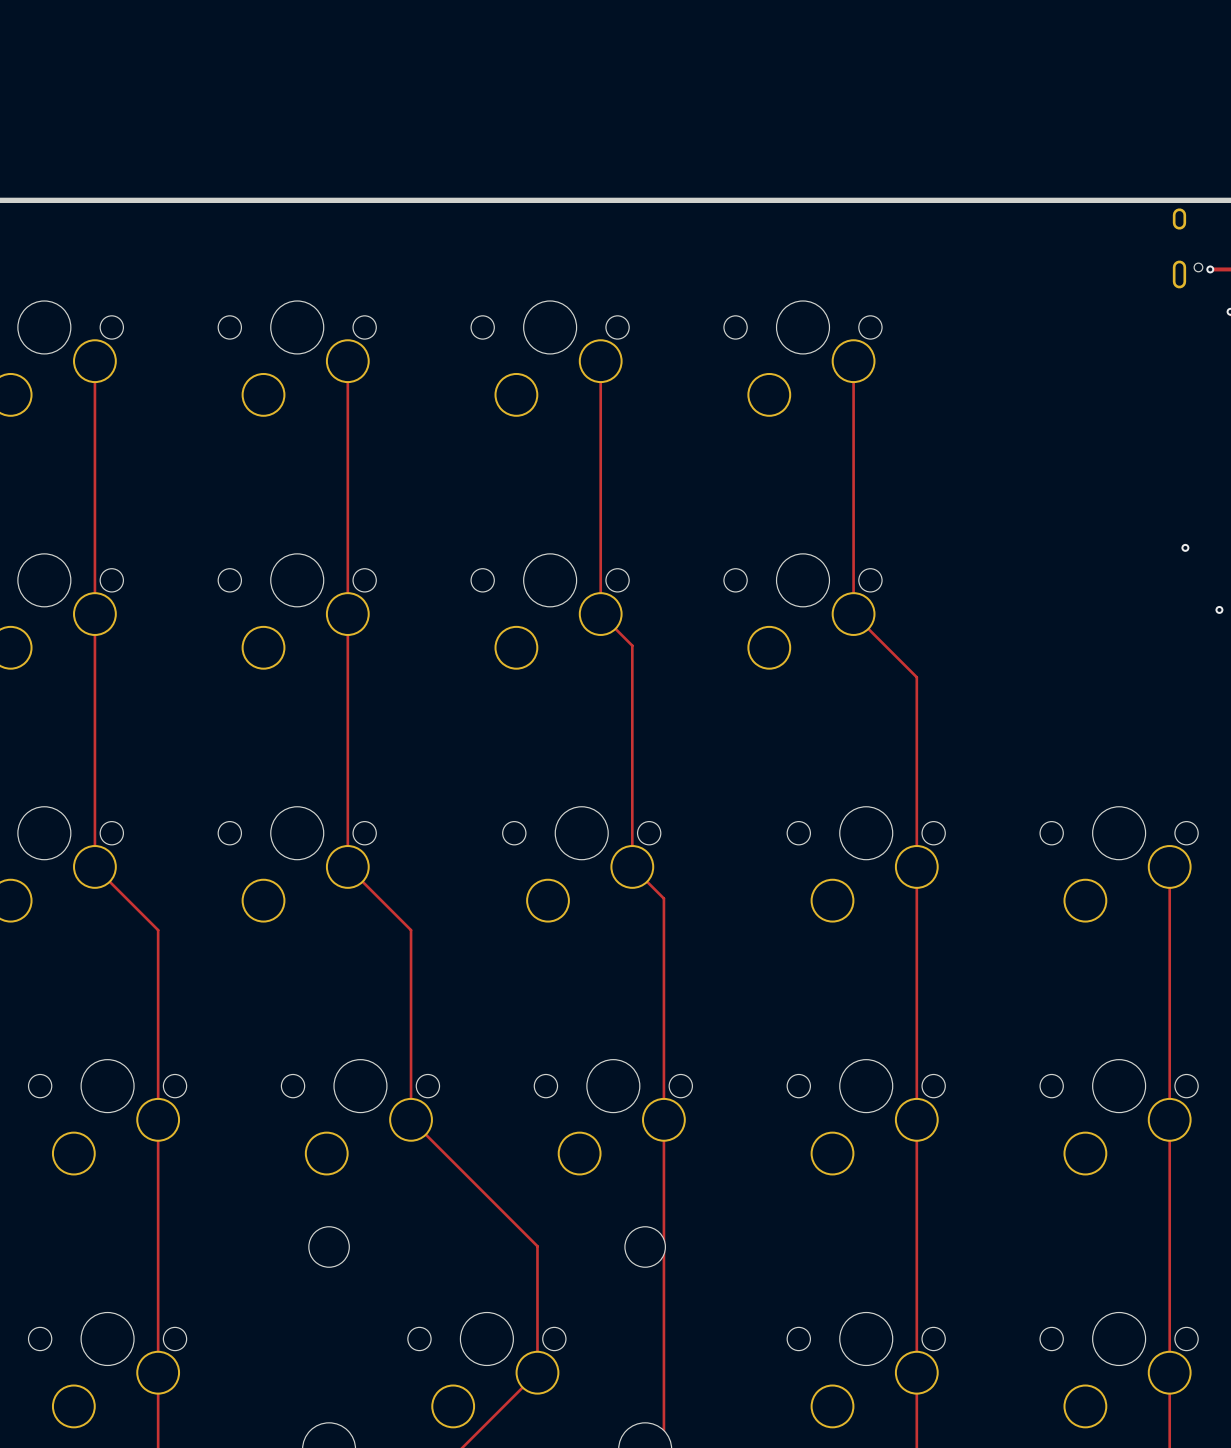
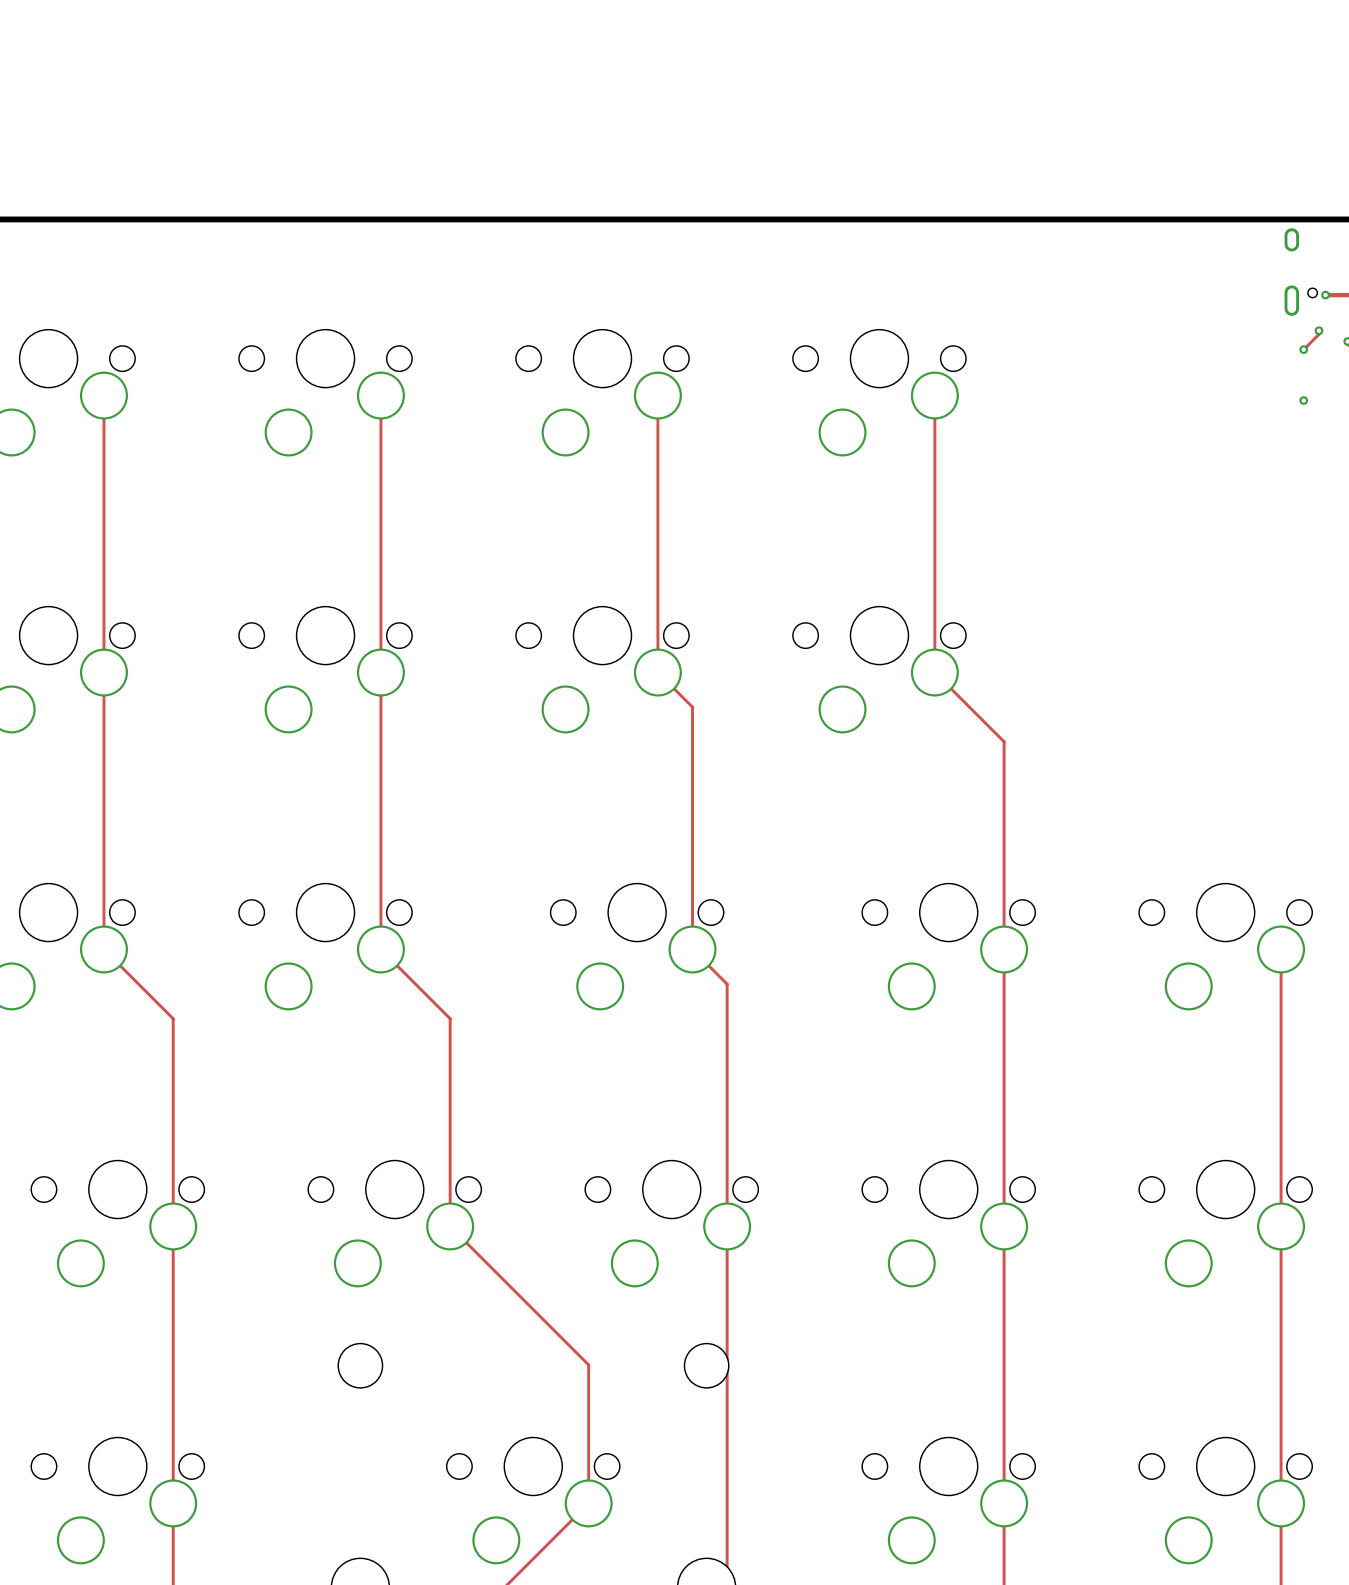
track: none -> (1318, 330) (1318, 334) (1303, 349)
via: none -> (1318, 330)
via: none -> (1303, 349)
via: none -> (1303, 400)
via: (1185, 547) -> none
via: (1219, 609) -> none

